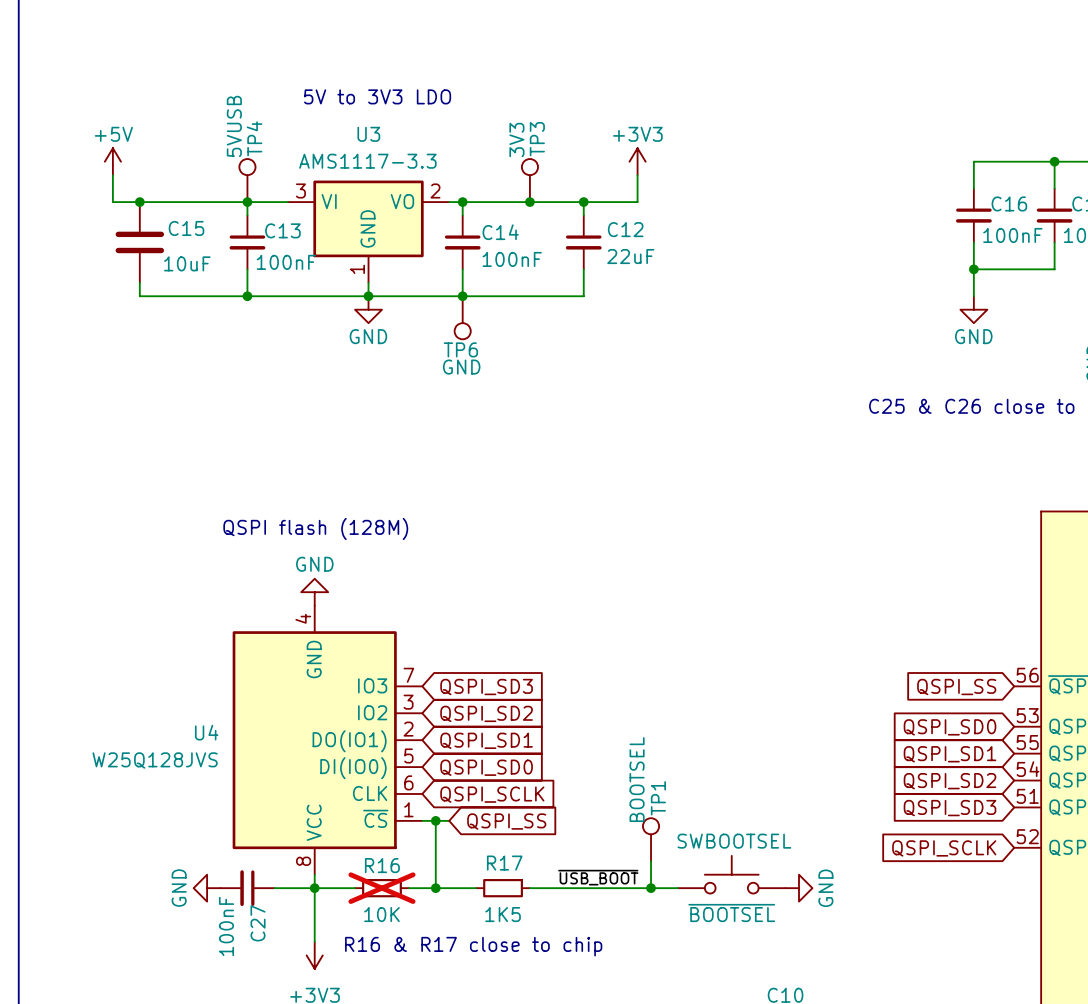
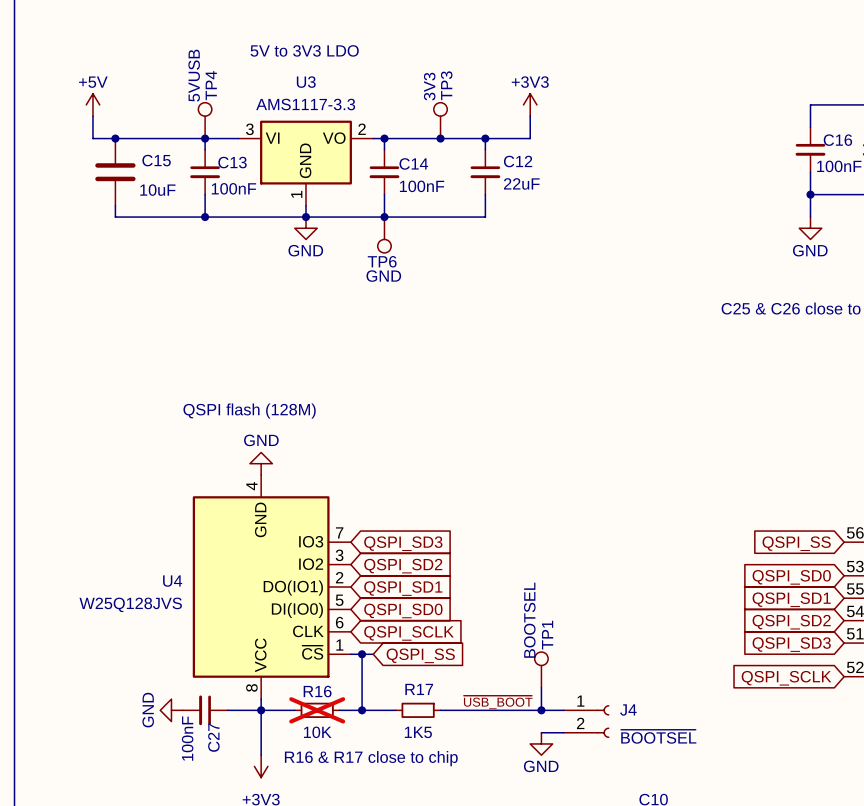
SWBOOTSEL: ~{BOOTSEL} (731, 874) -> none
power symbol rotation: 0° (799, 888) -> 90° clockwise (541, 743)
power symbol position: GND (799, 888) -> GND (541, 743)
J4: none -> ~{BOOTSEL} (586, 721)
wire: none -> (541, 732) (563, 732)

